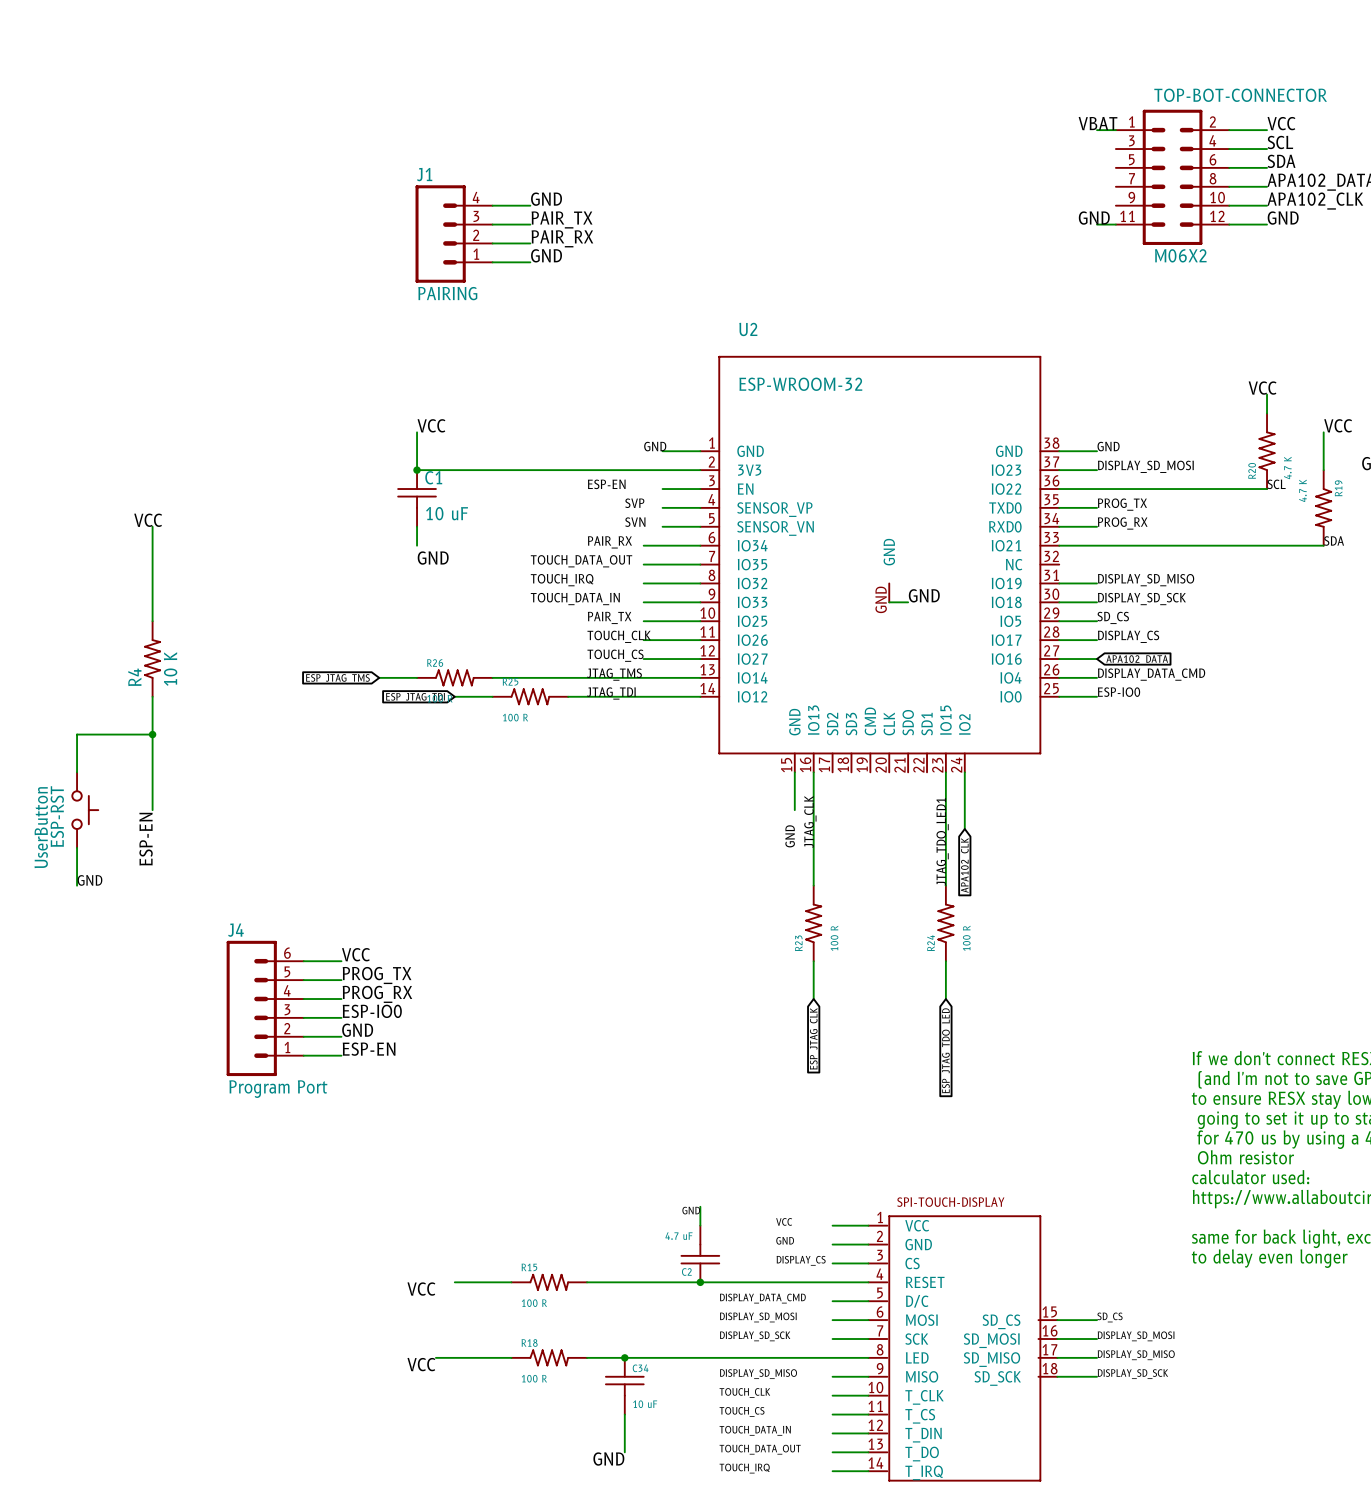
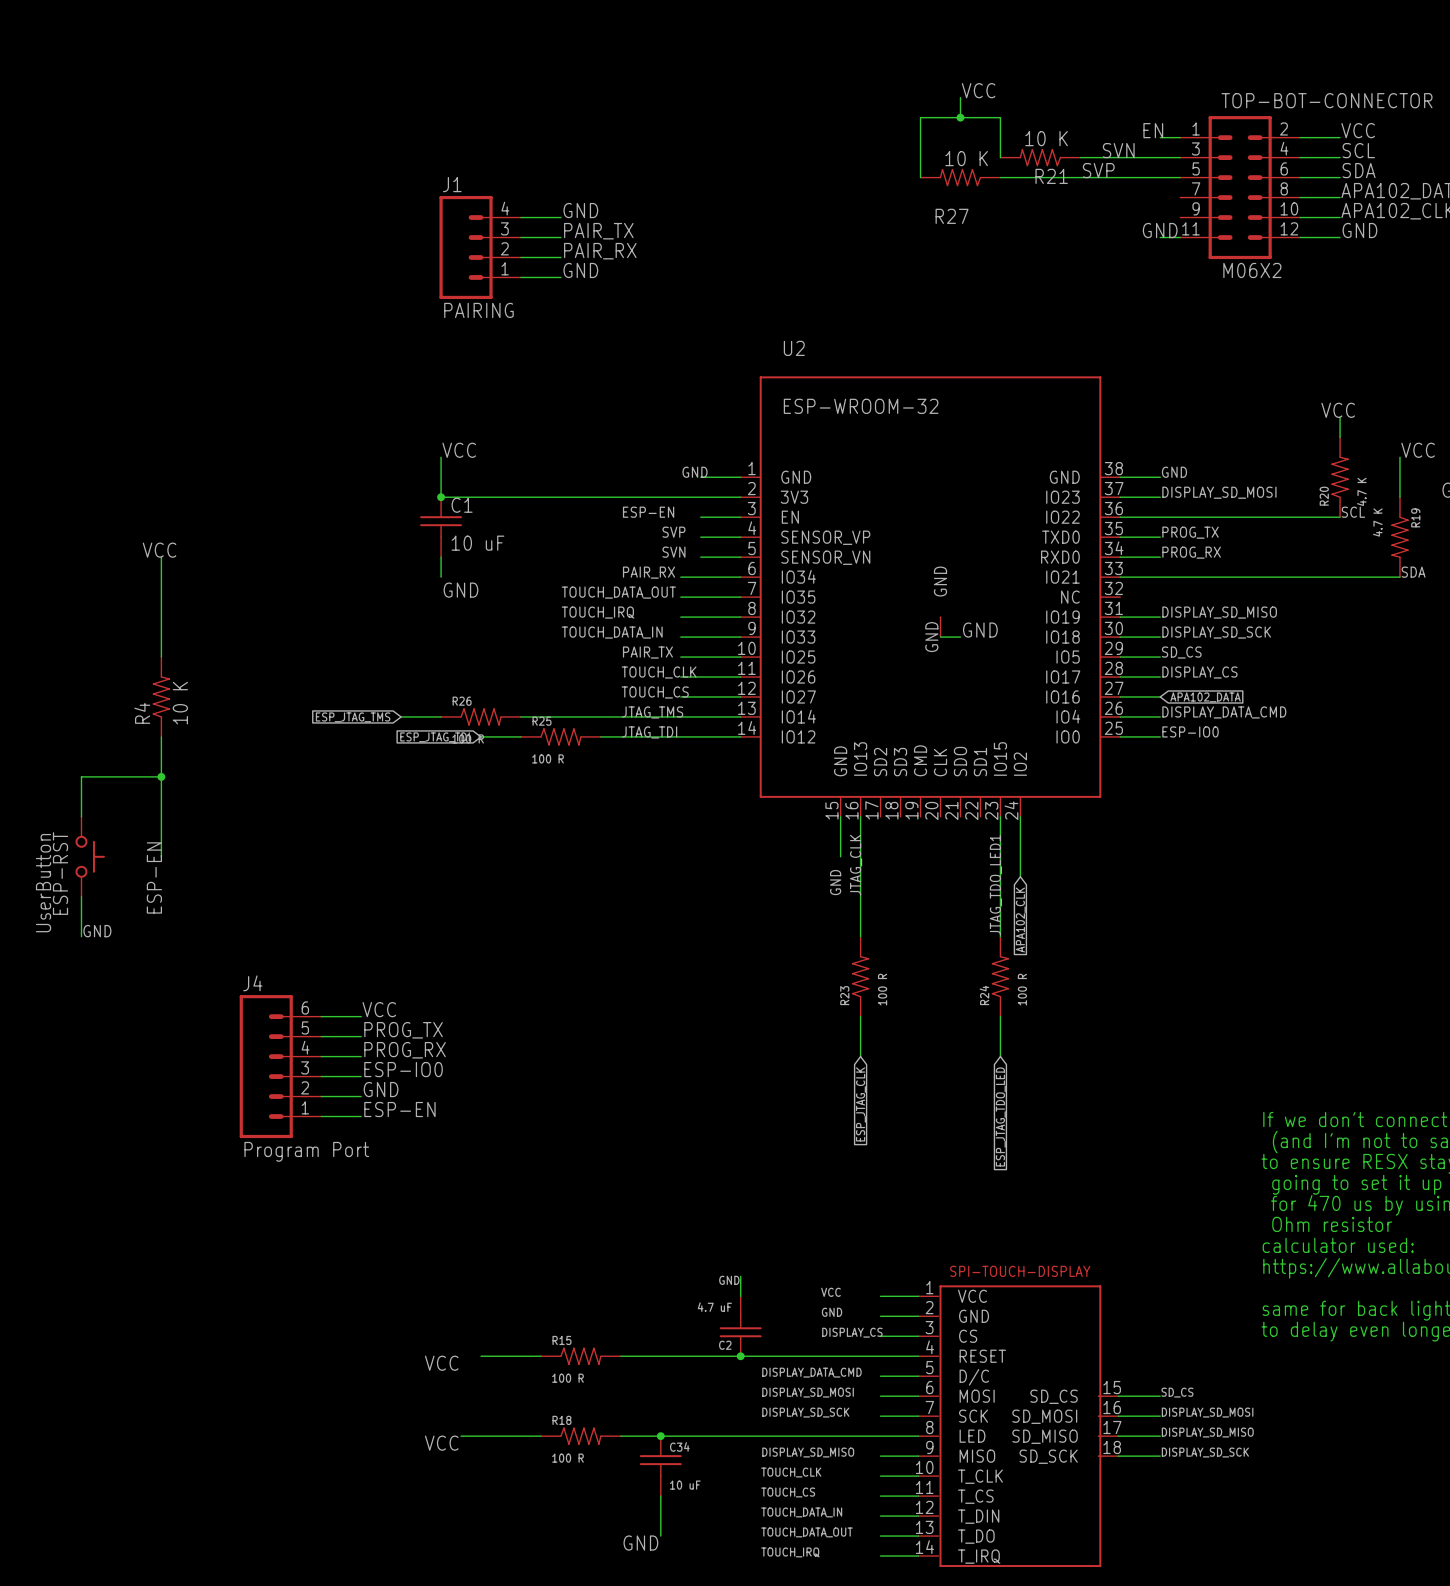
label: none -> VCC (978, 90)
wire: none -> (960, 97) (960, 117)
junction: none -> (960, 117)
label: VBAT (1098, 123) -> EN (1153, 130)
label: none -> SVN (1118, 150)
wire: none -> (1000, 157) (1000, 117) (920, 117) (920, 177)
R21: none -> 10 K (1040, 157)
wire: none -> (1080, 157) (1180, 157)
label: none -> SVP (1098, 170)
R27: none -> 10 K (960, 177)
wire: none -> (1000, 177) (1180, 177)

